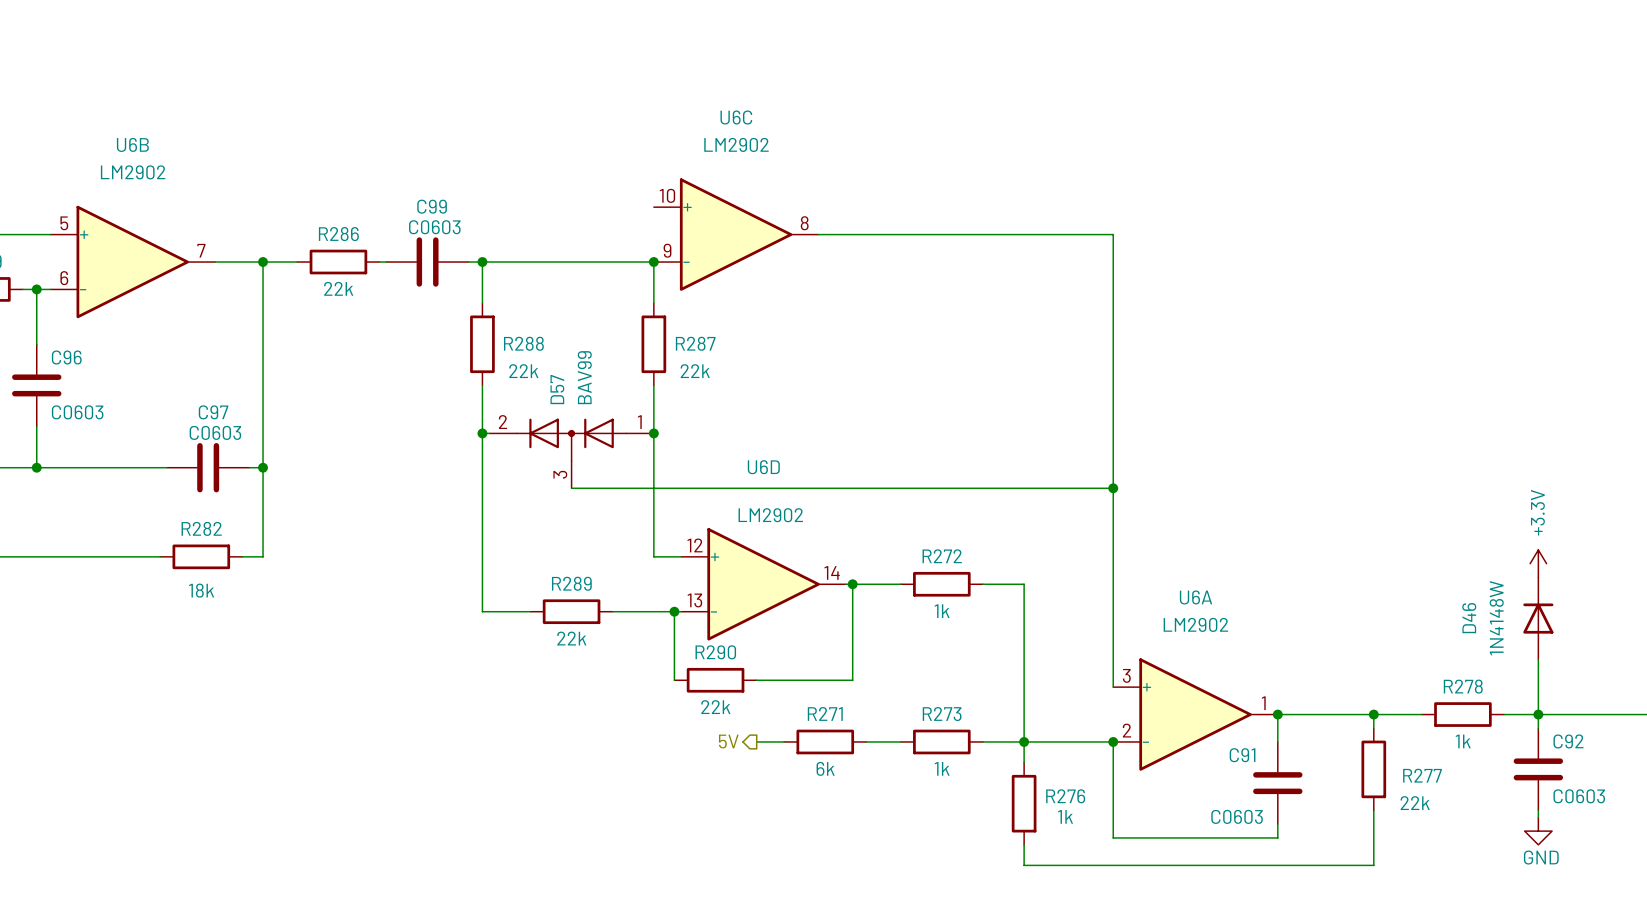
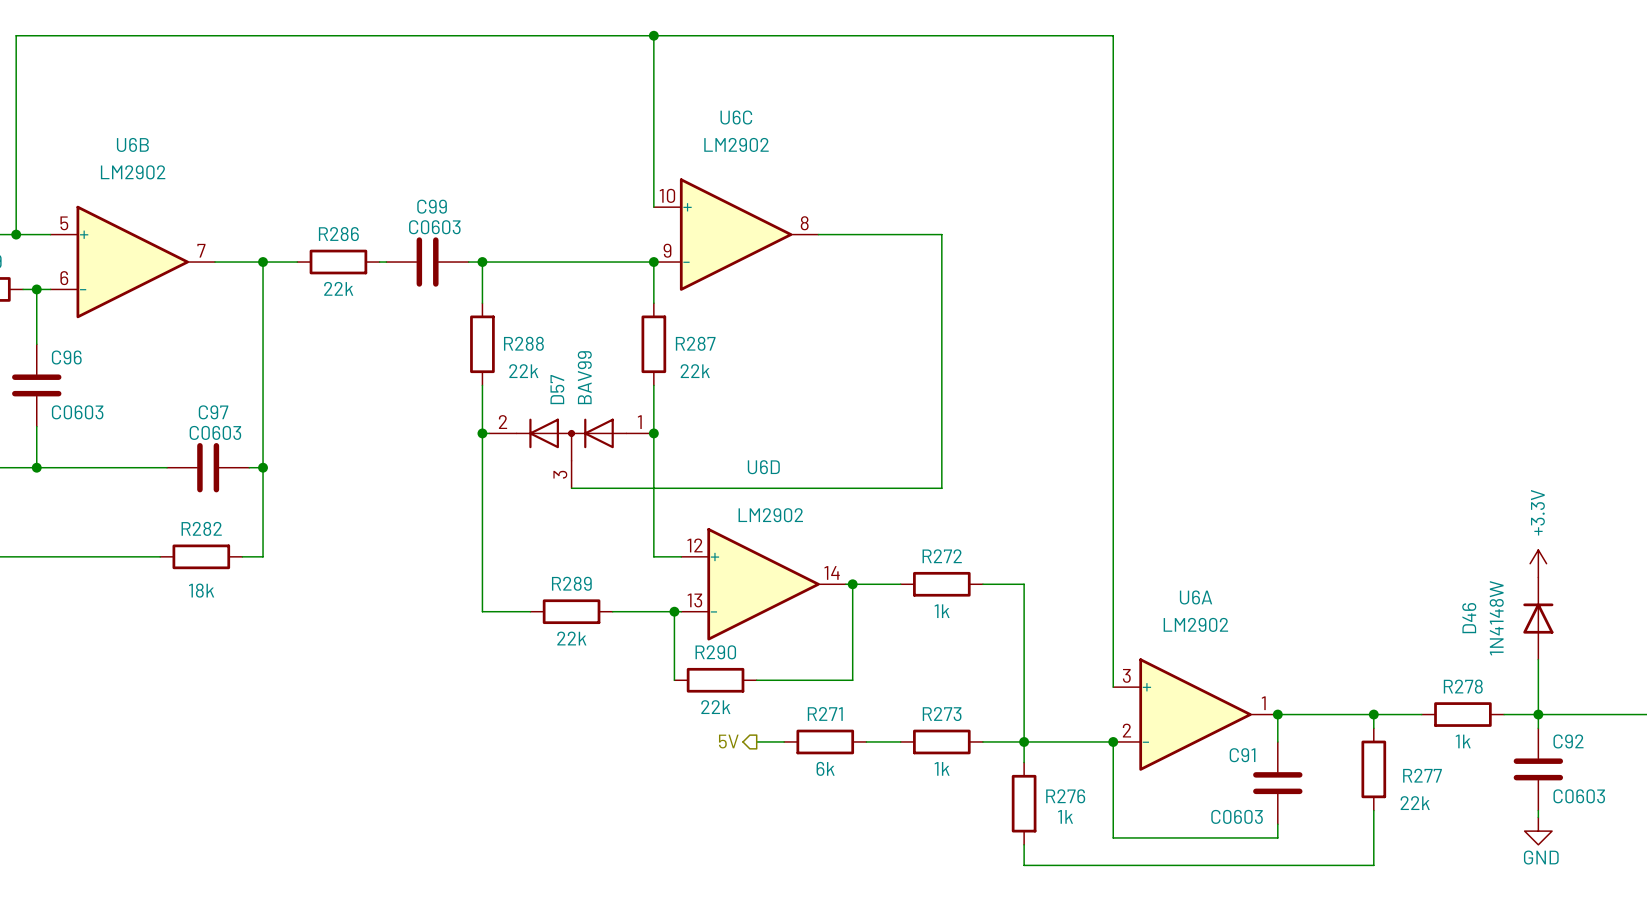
wire: none -> (653, 35) (653, 207)
junction: none -> (653, 35)
wire: none -> (16, 234) (16, 35) (1113, 35) (1113, 234)
junction: none -> (16, 234)
wire: (941, 234) (1113, 234) -> (941, 234) (941, 488)
wire: (941, 488) (1113, 488) -> none
junction: (1113, 488) -> none

